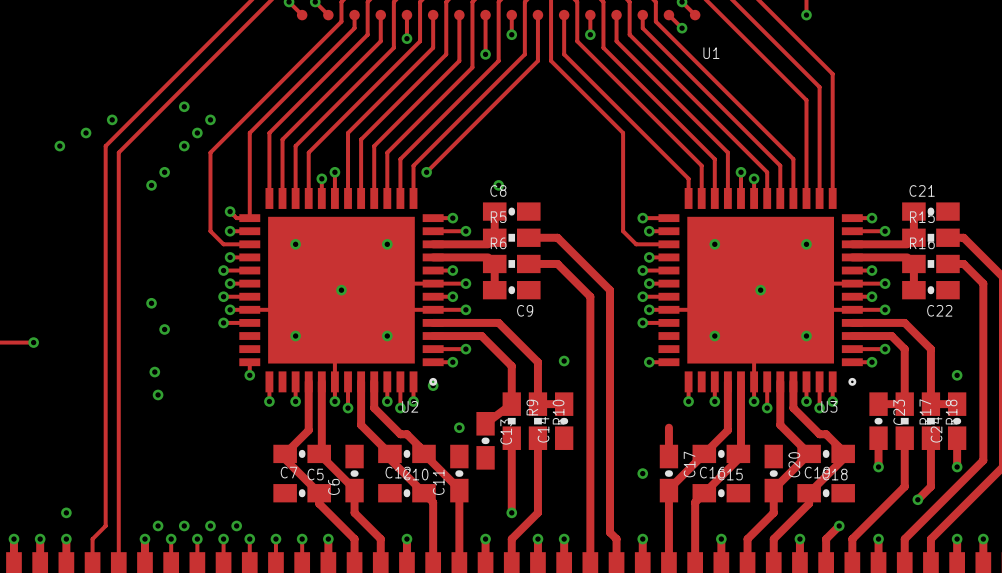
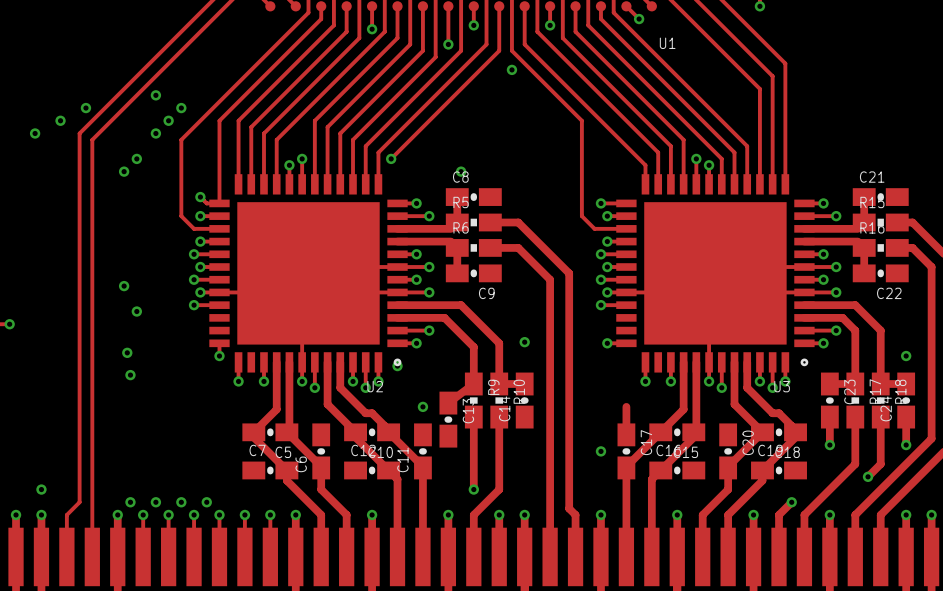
via: none -> (511, 69)
via: (295, 244) -> none
via: (387, 244) -> none
via: (714, 244) -> none
via: (806, 244) -> none
via: (341, 290) -> none
via: (760, 290) -> none
via: (295, 336) -> none
via: (387, 336) -> none
via: (714, 336) -> none
via: (806, 336) -> none

